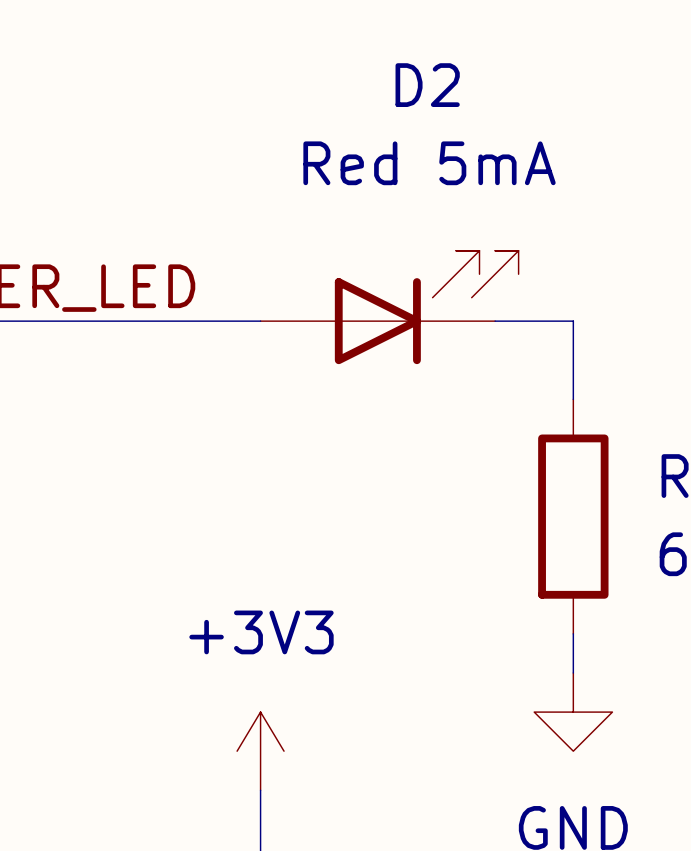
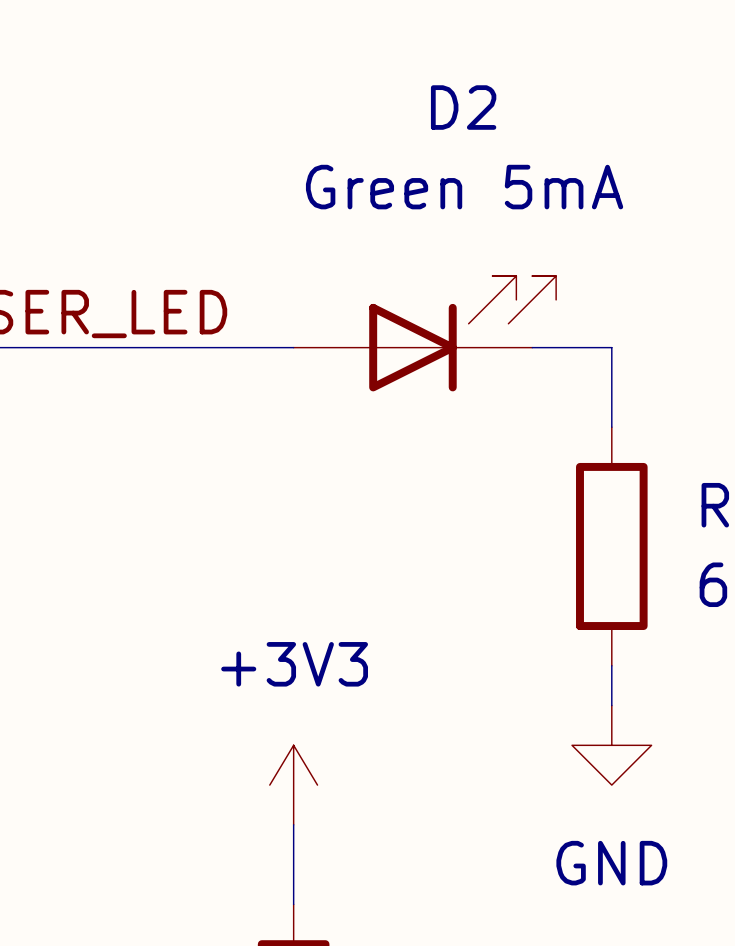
D2 value: Red 5mA (429, 163) -> Green 5mA (464, 187)

